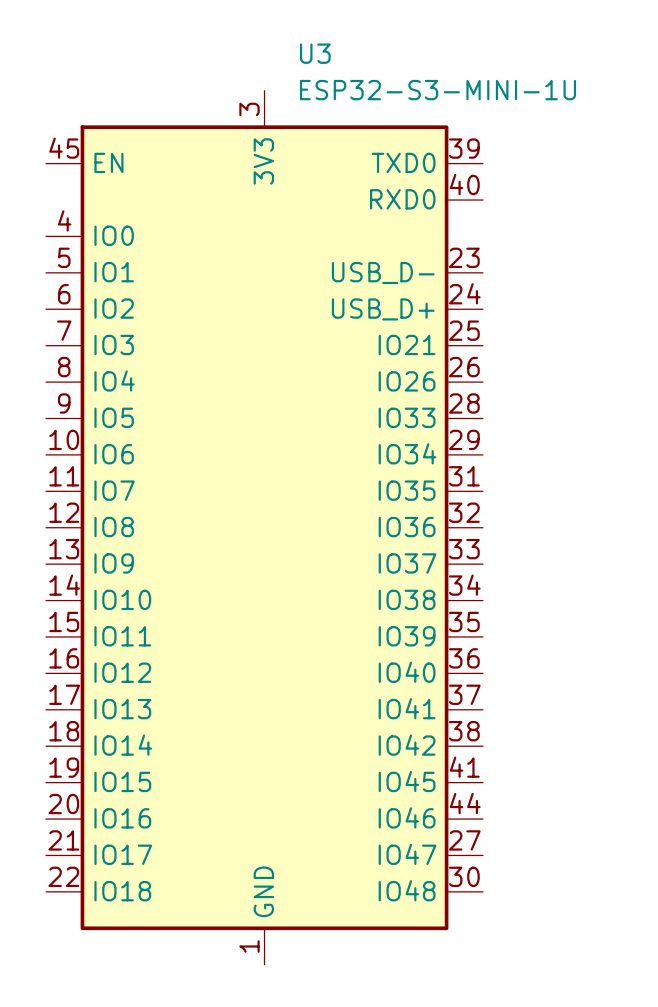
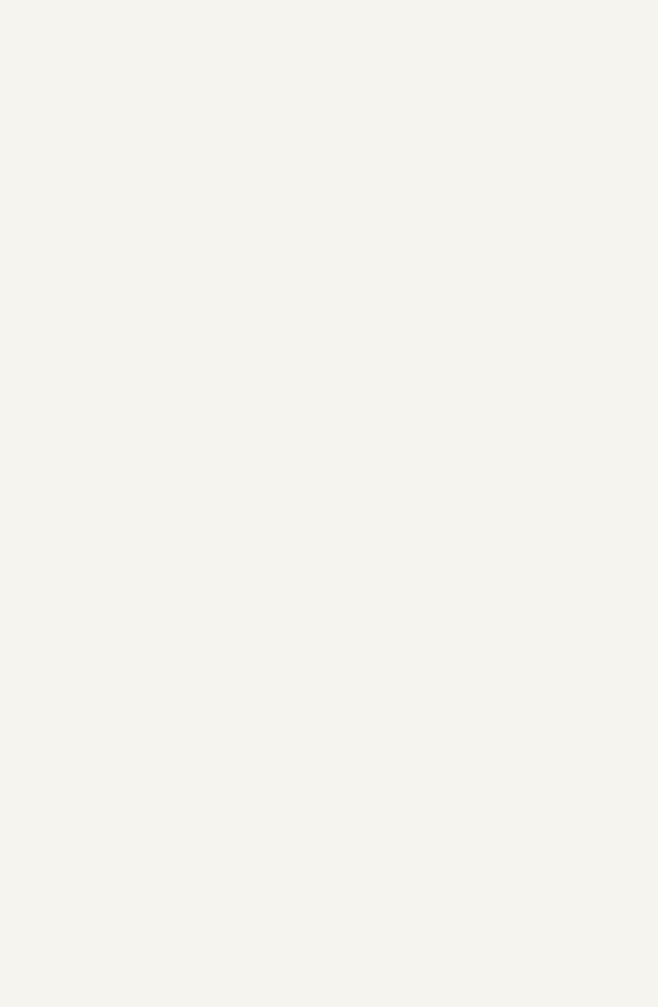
U3: ESP32-S3-MINI-1U (264, 527) -> none

